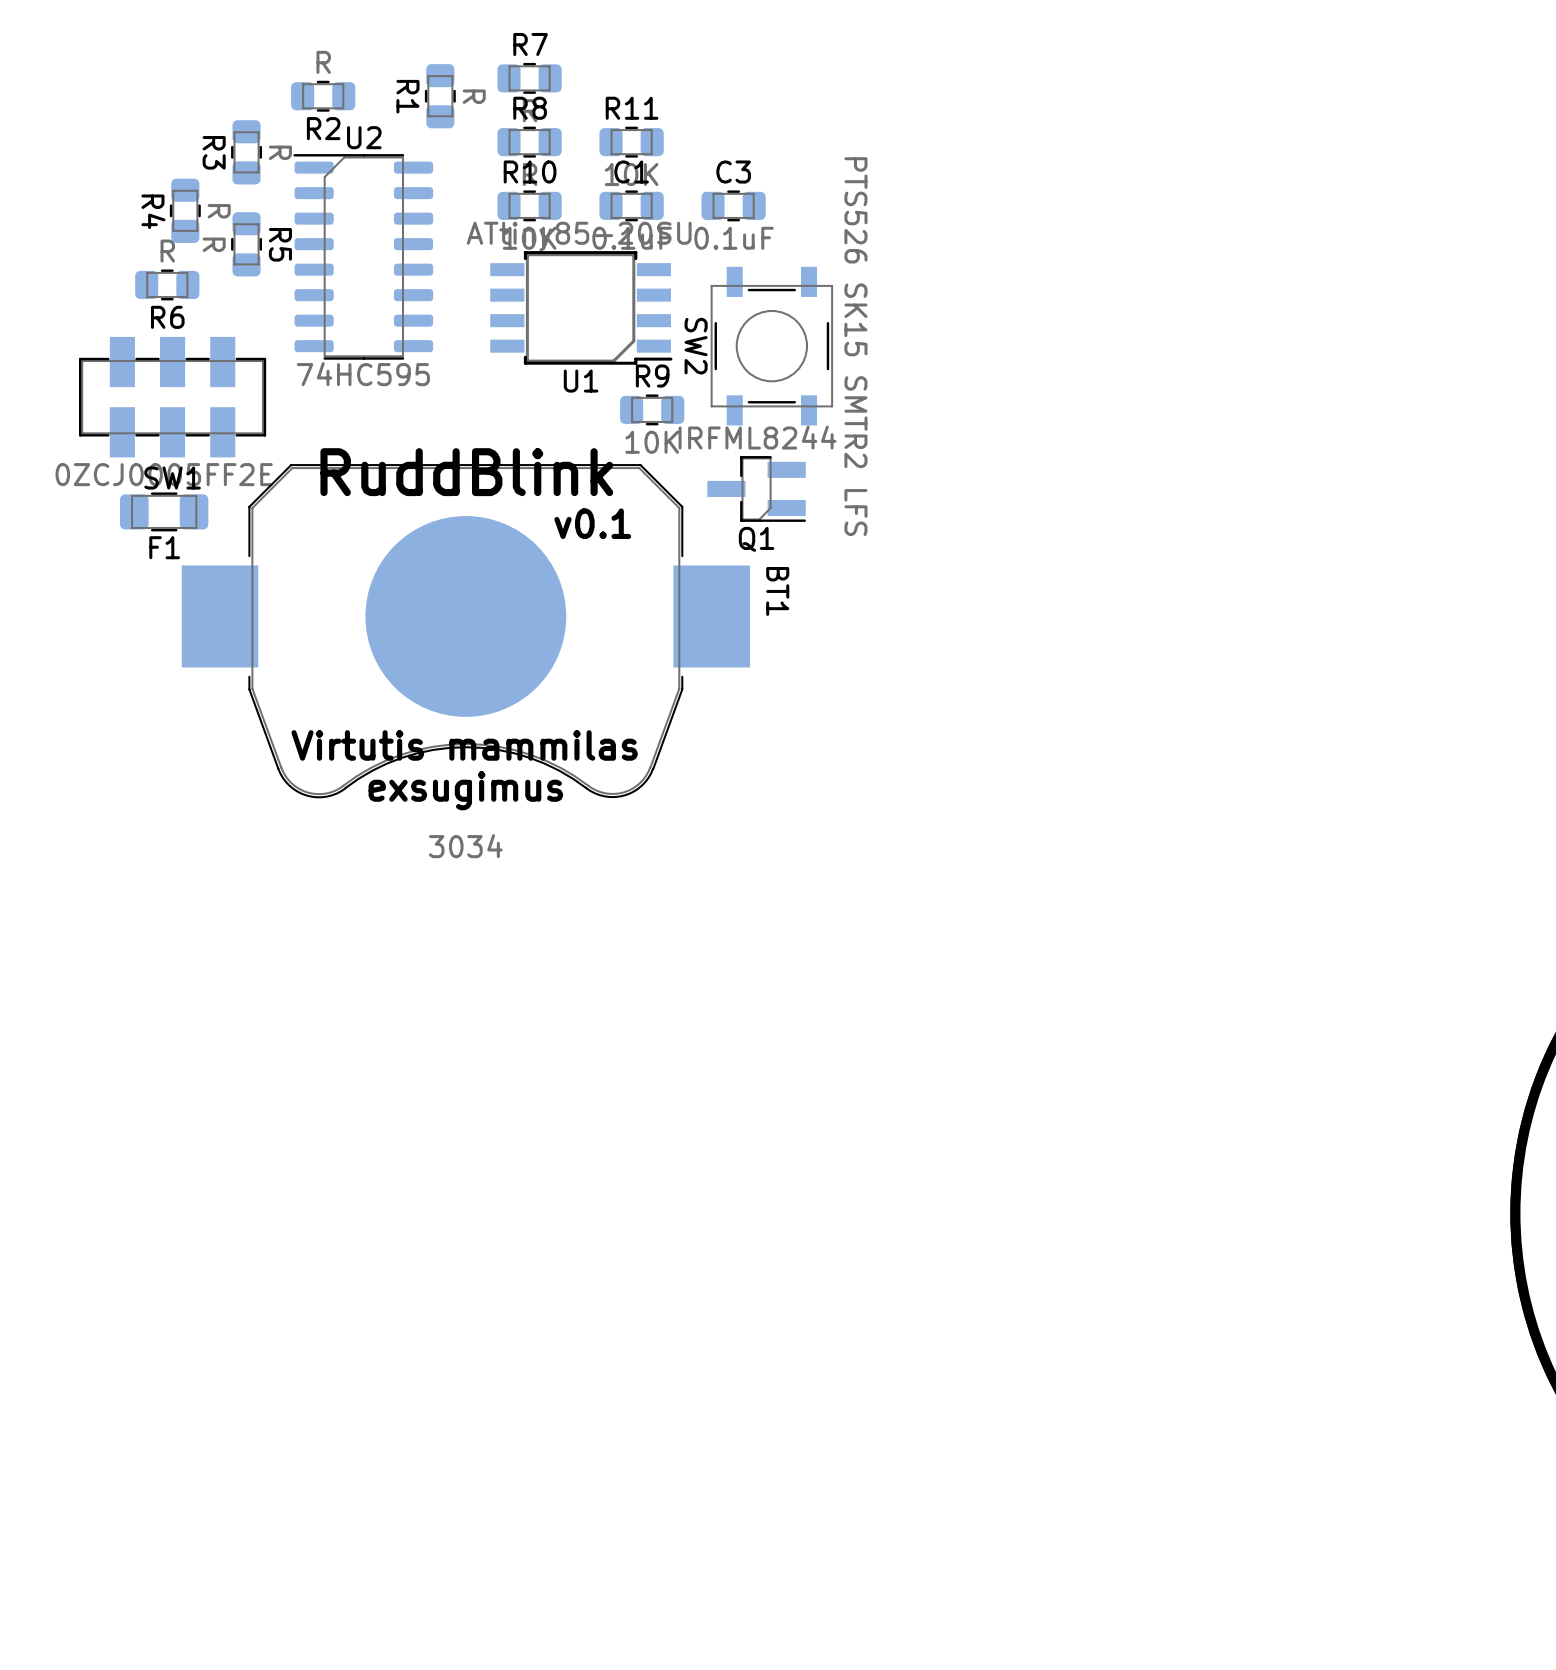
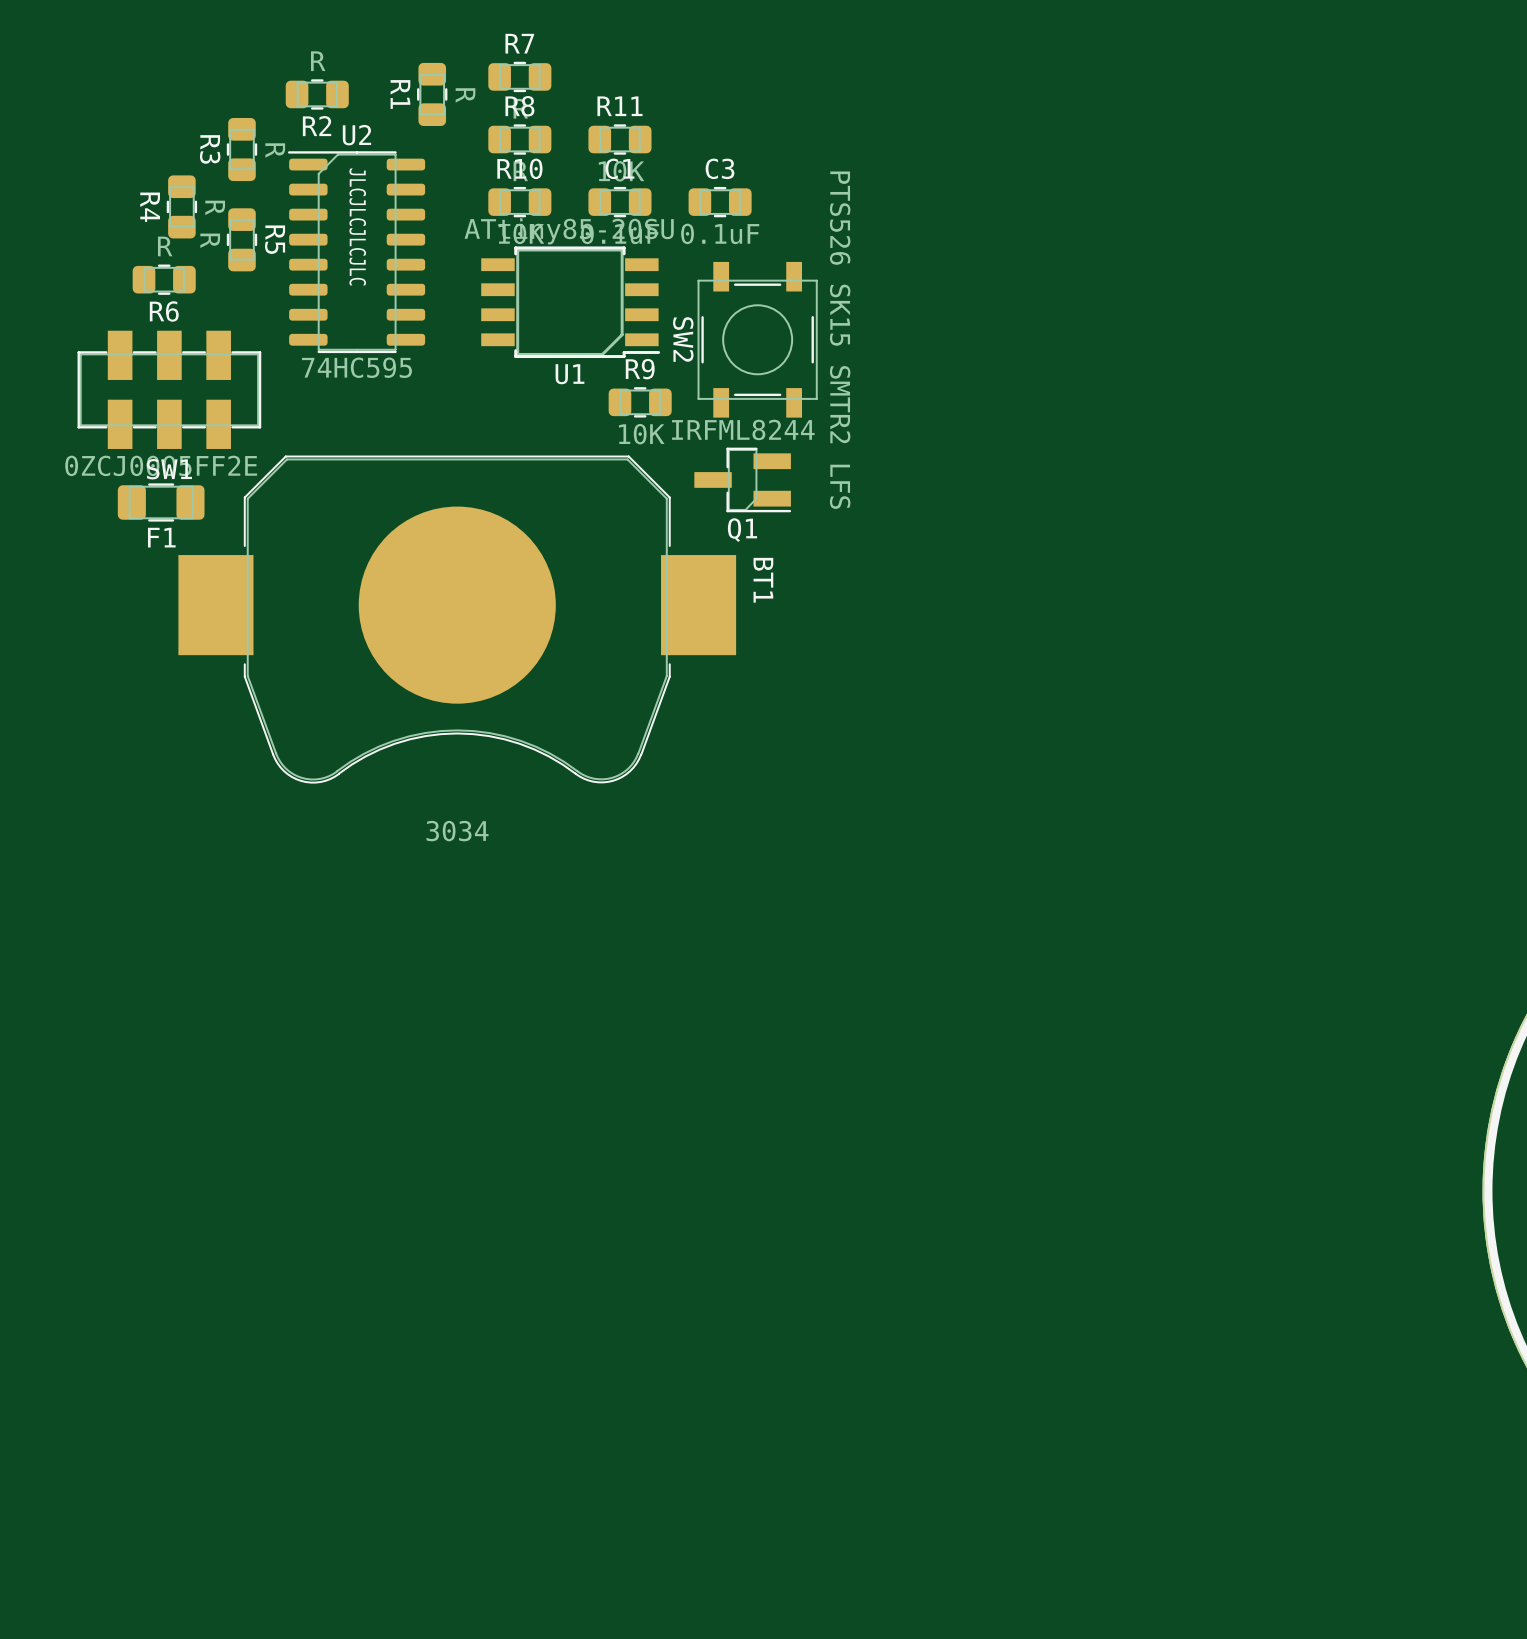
text: none -> JLCJLCJLCJLC (357, 226)
text: RuddBlink (466, 472) -> none
text: v0.1 (592, 523) -> none
text: Virtutis mammilas (464, 745) -> none
text: exsugimus (465, 790) -> none

